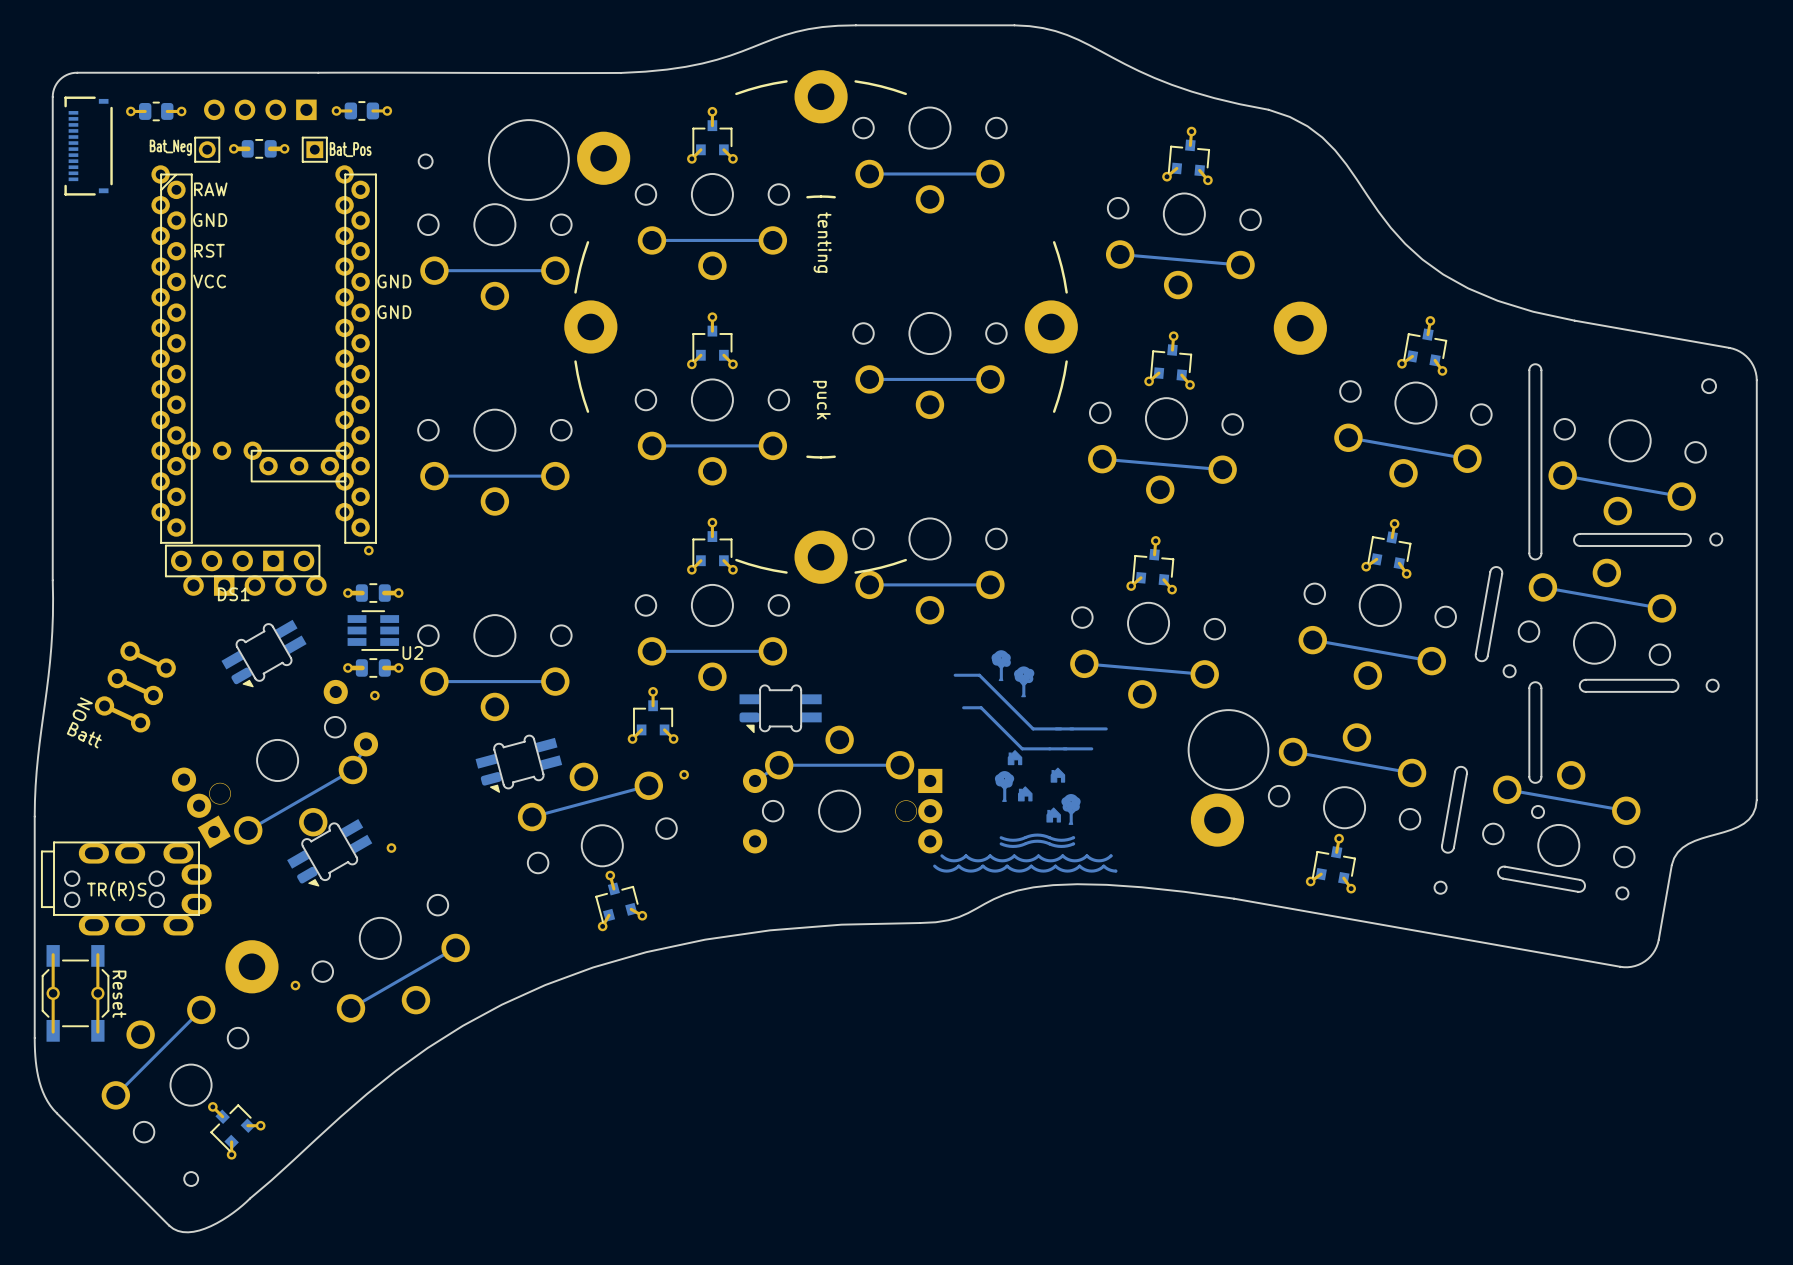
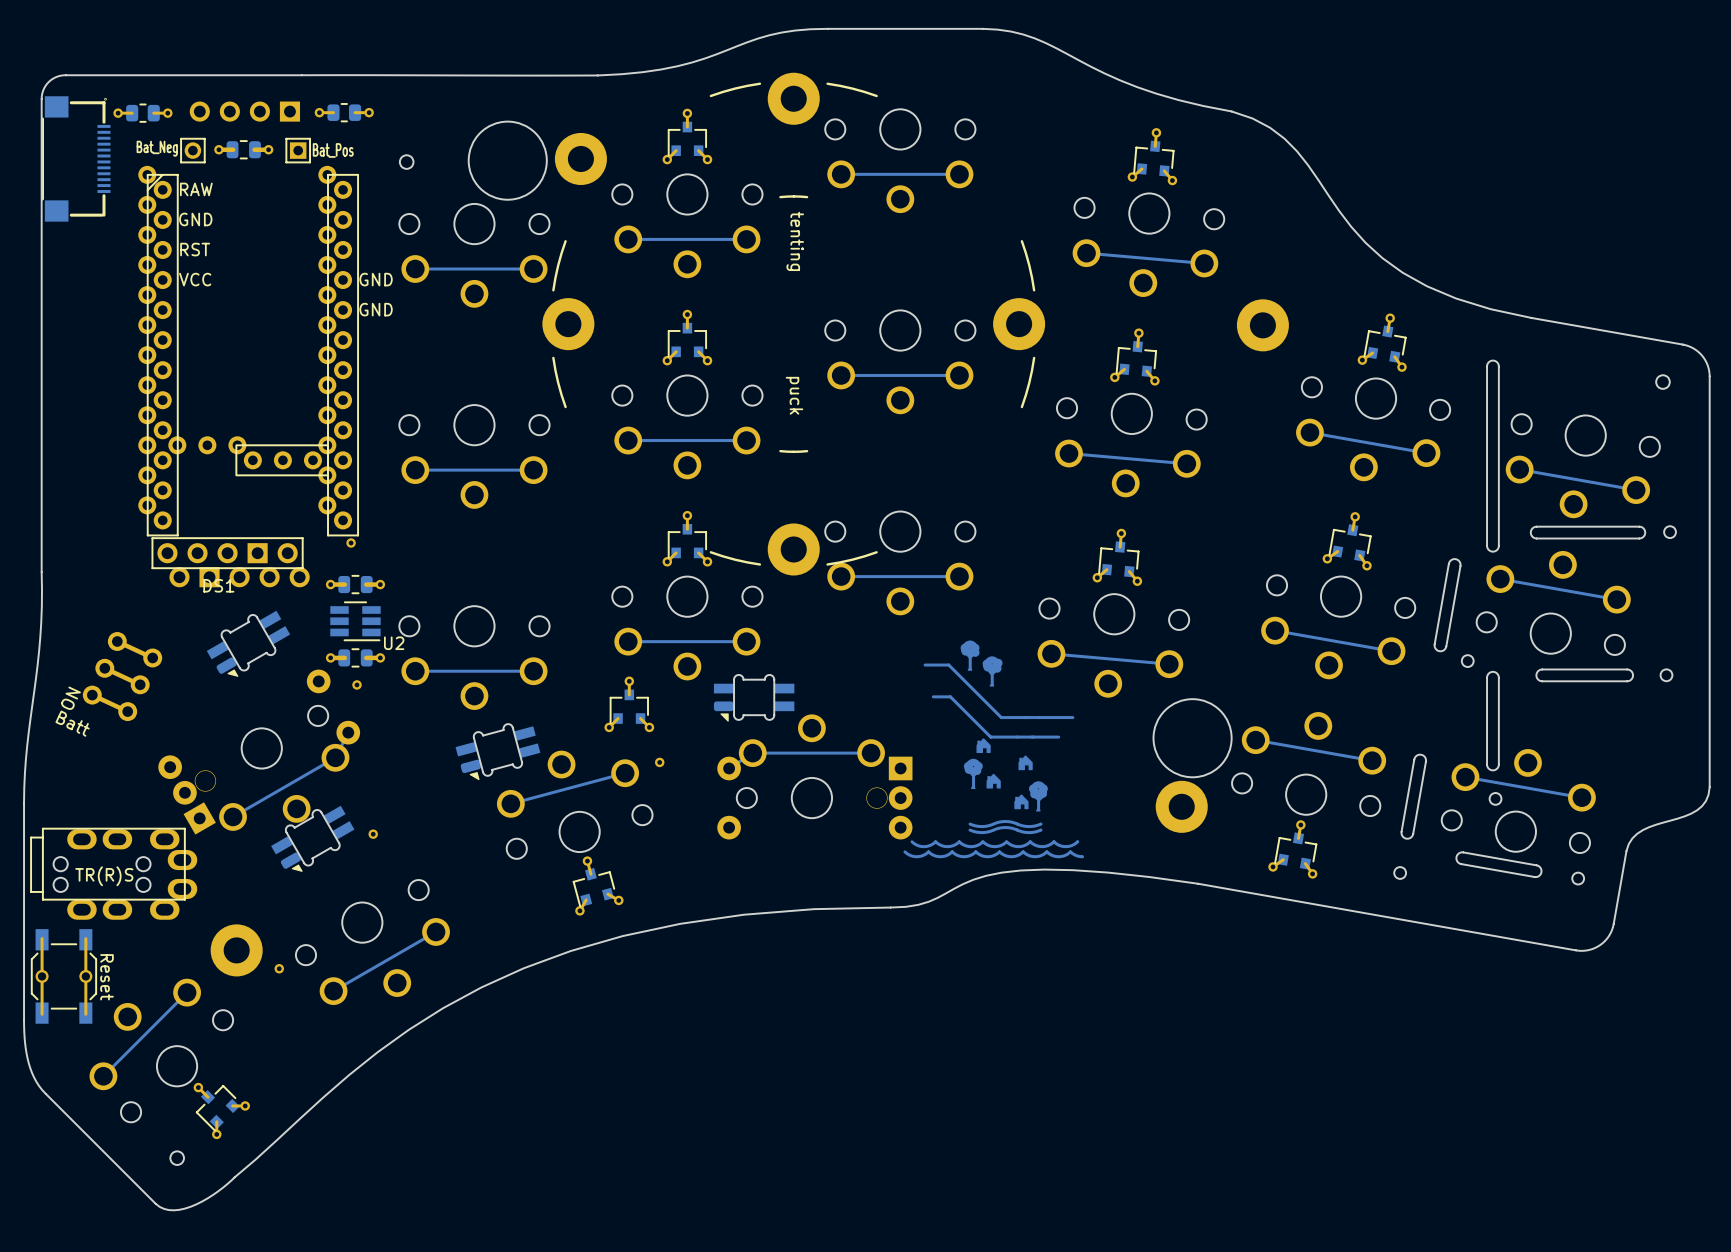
part: (88, 146) -> none
part: none -> (75, 158)

